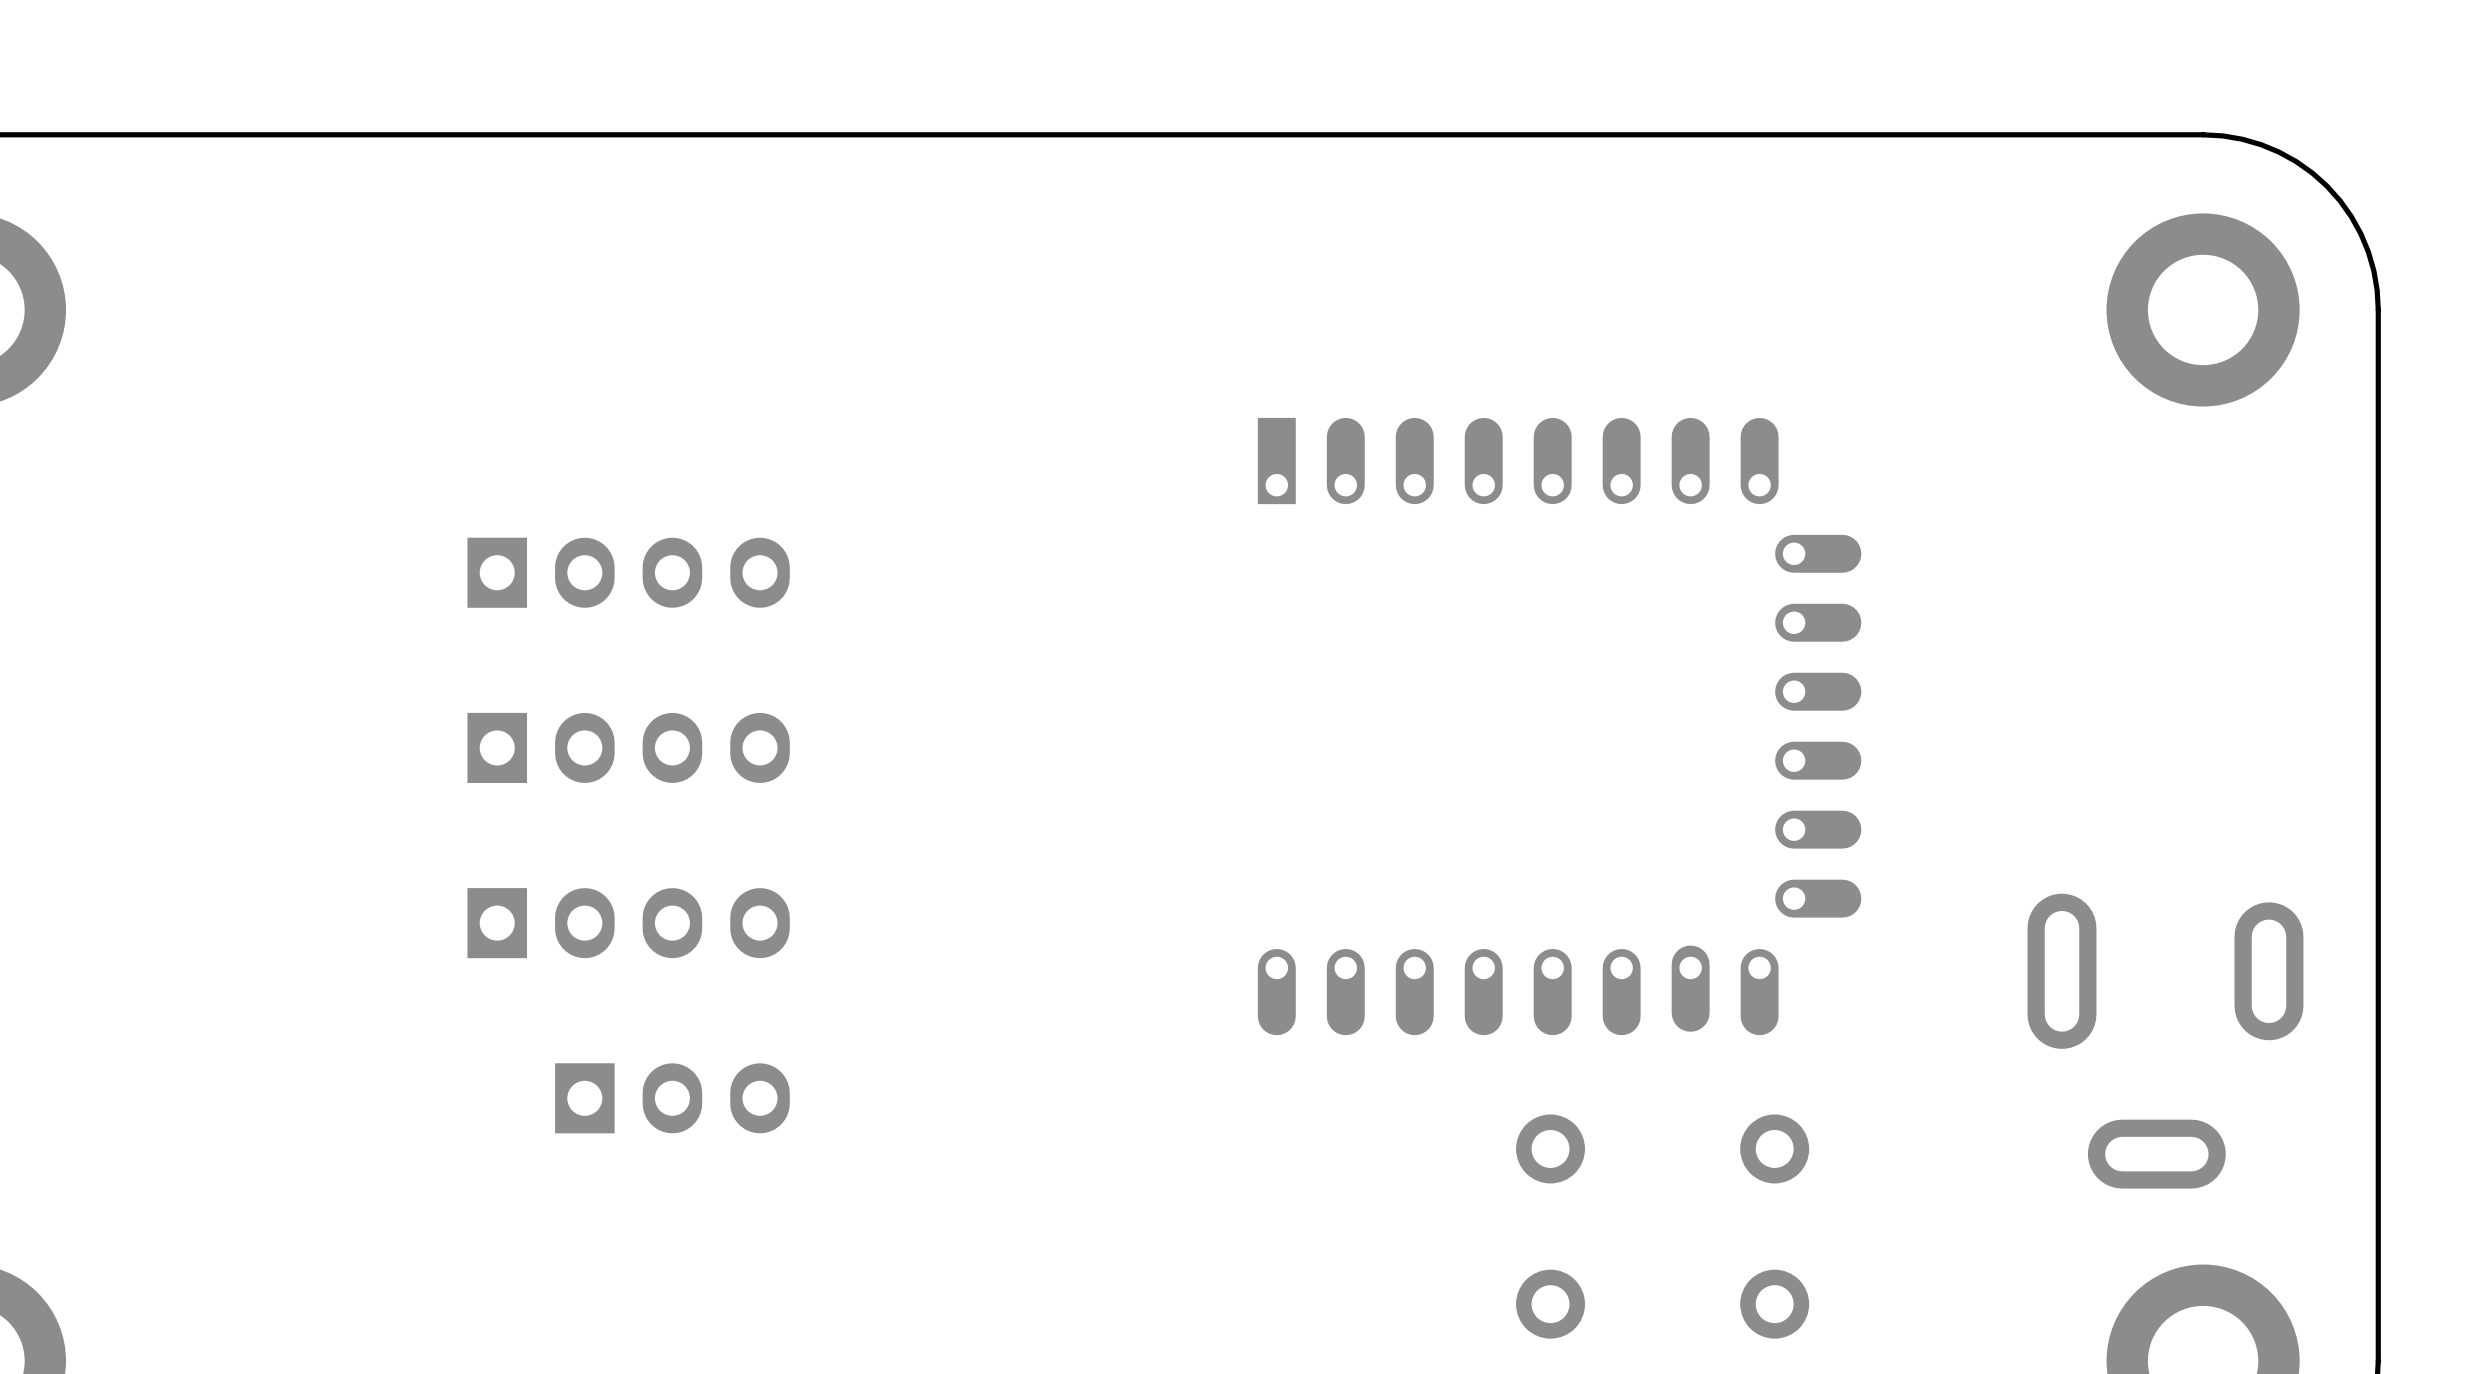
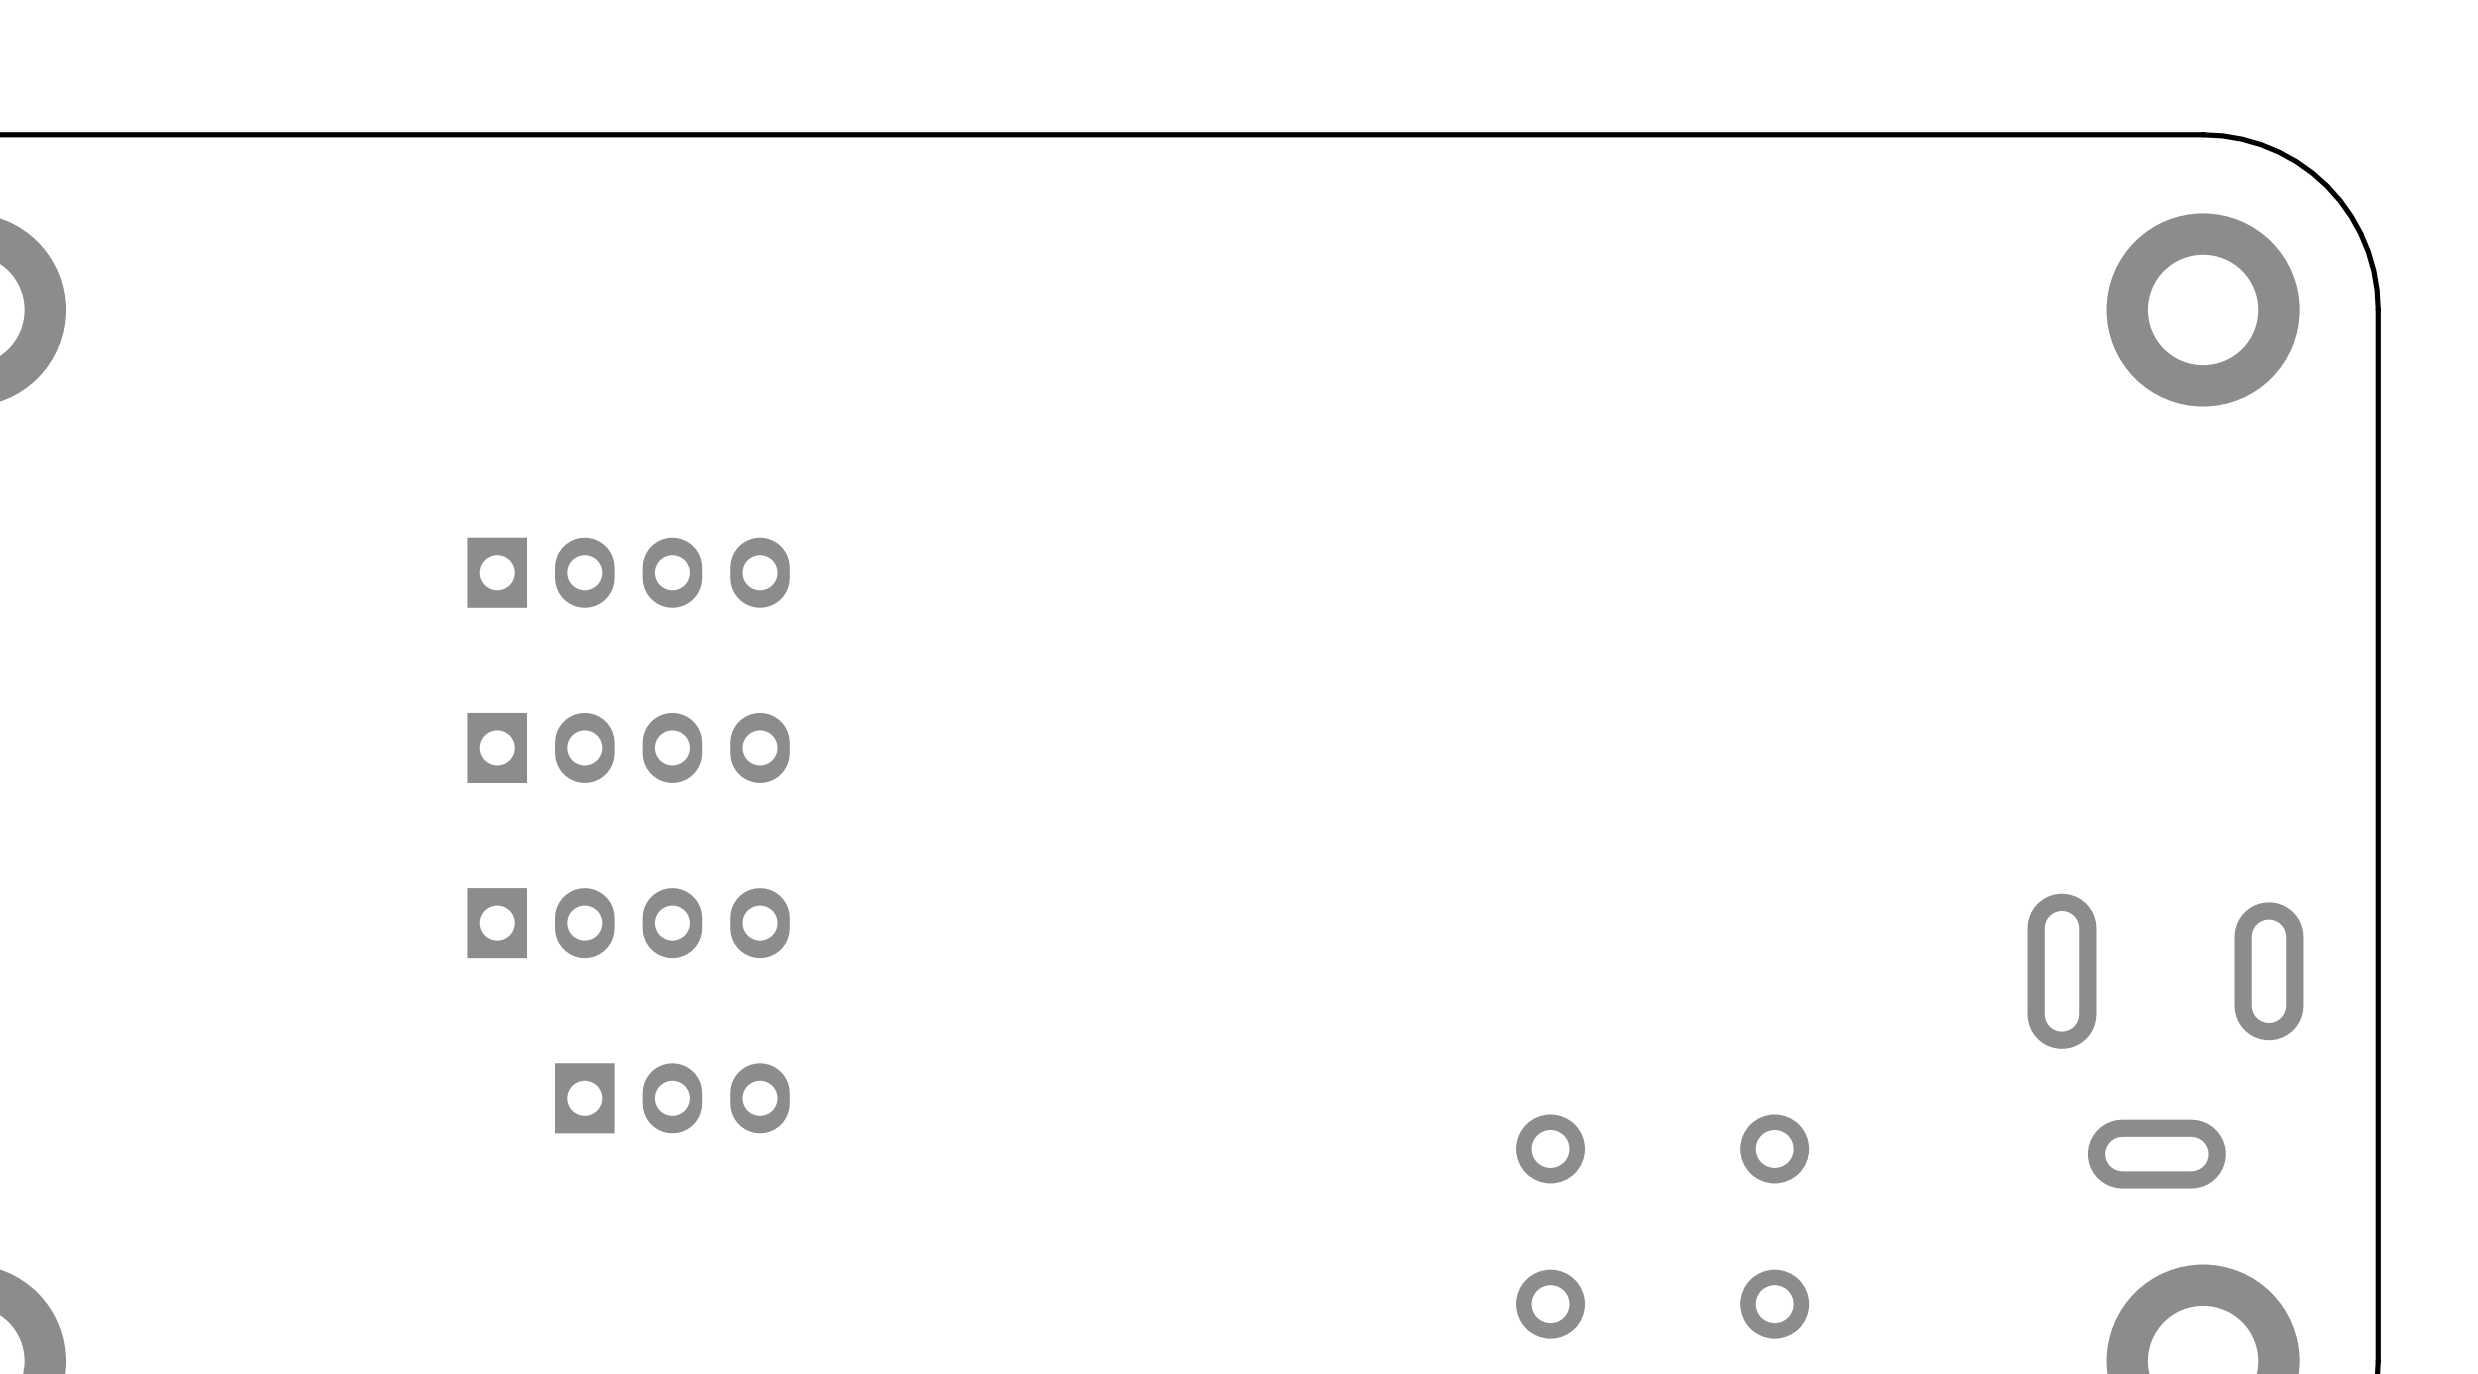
part: (1559, 726) -> none

